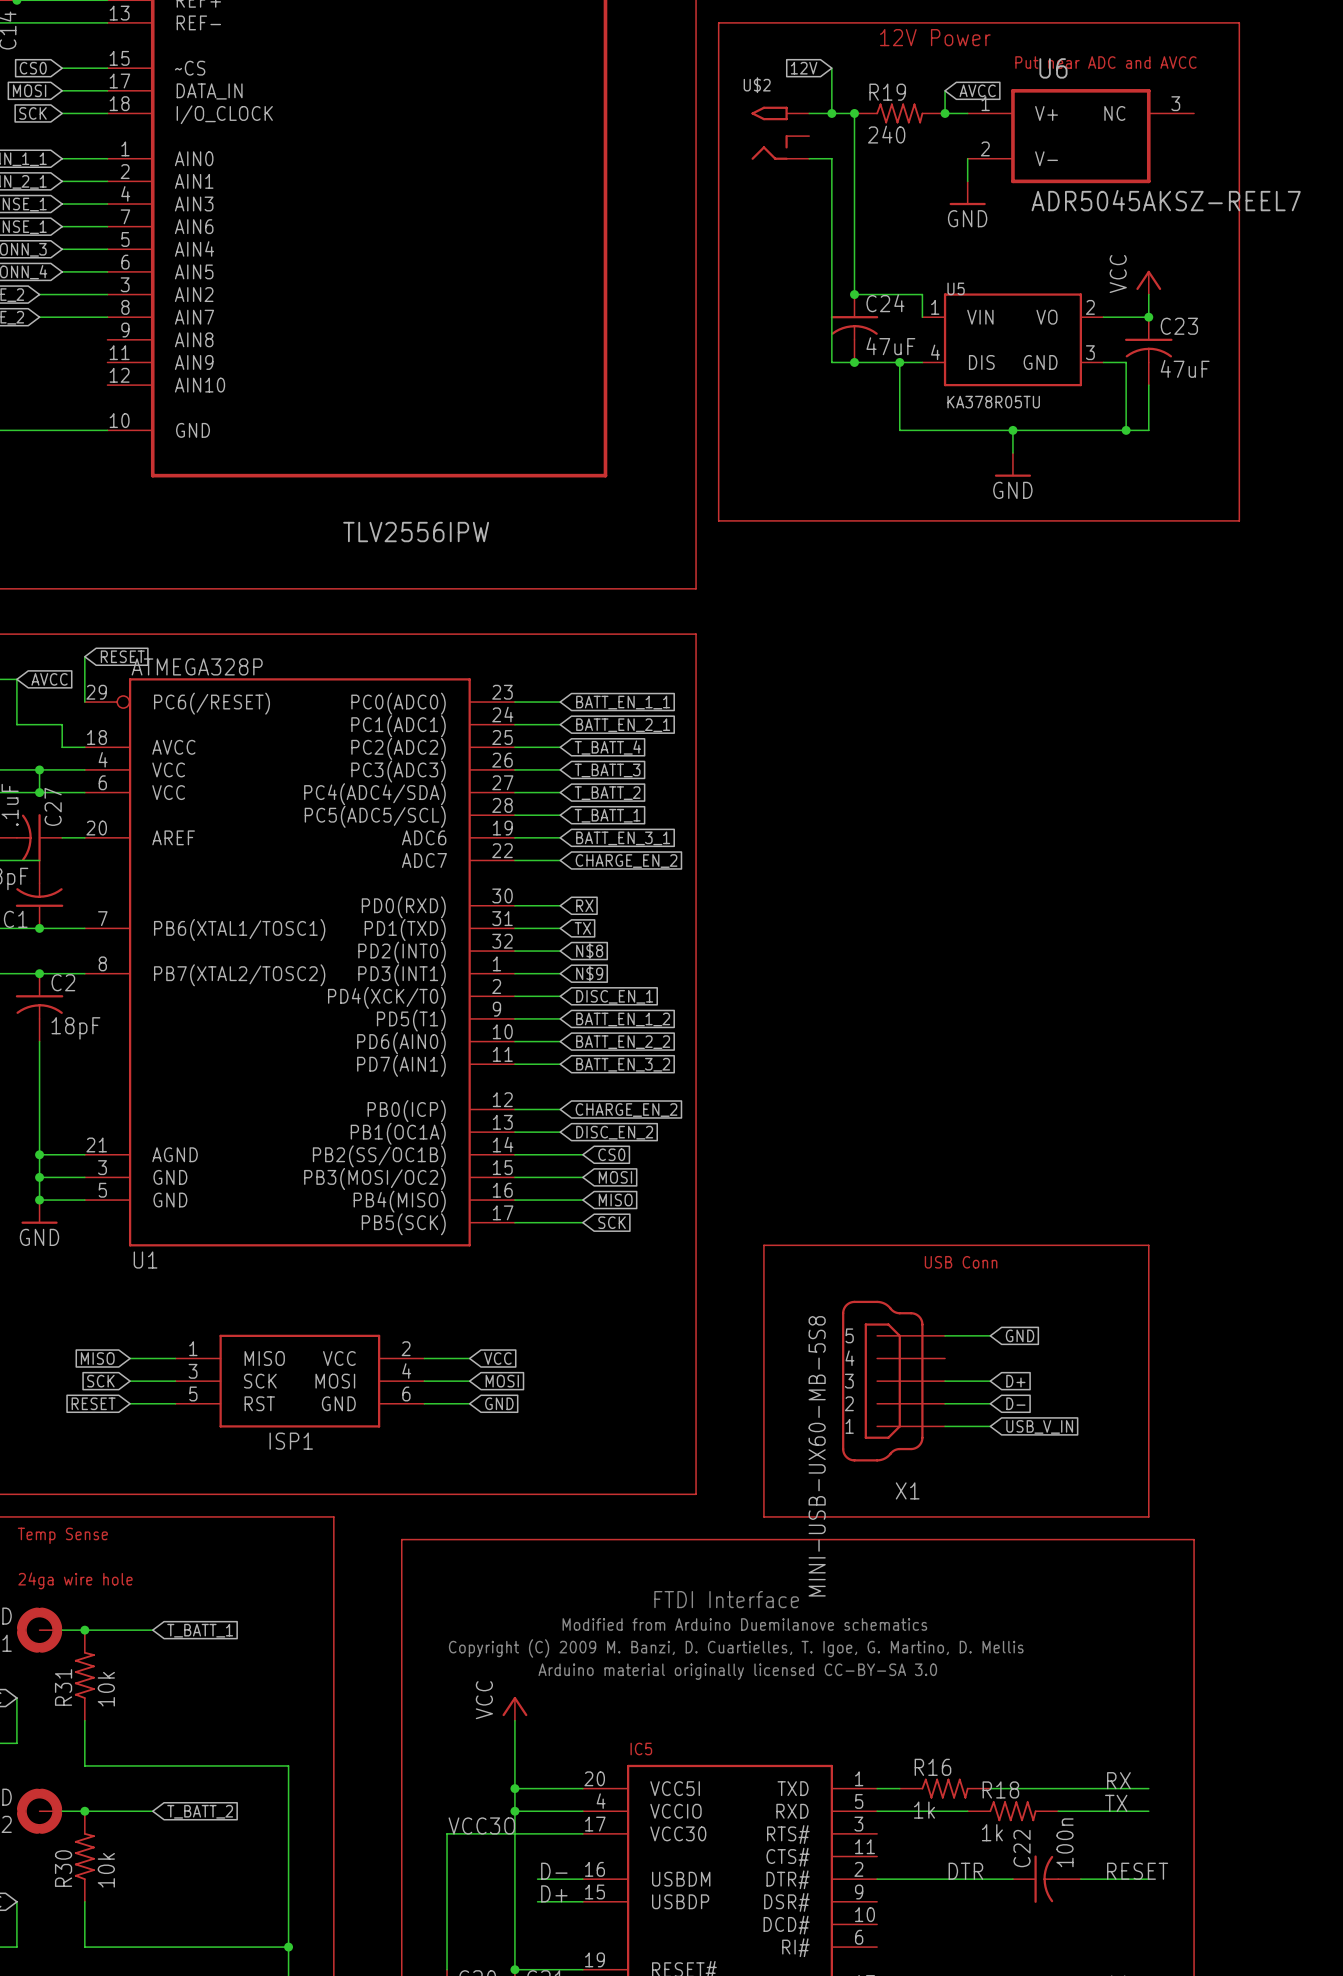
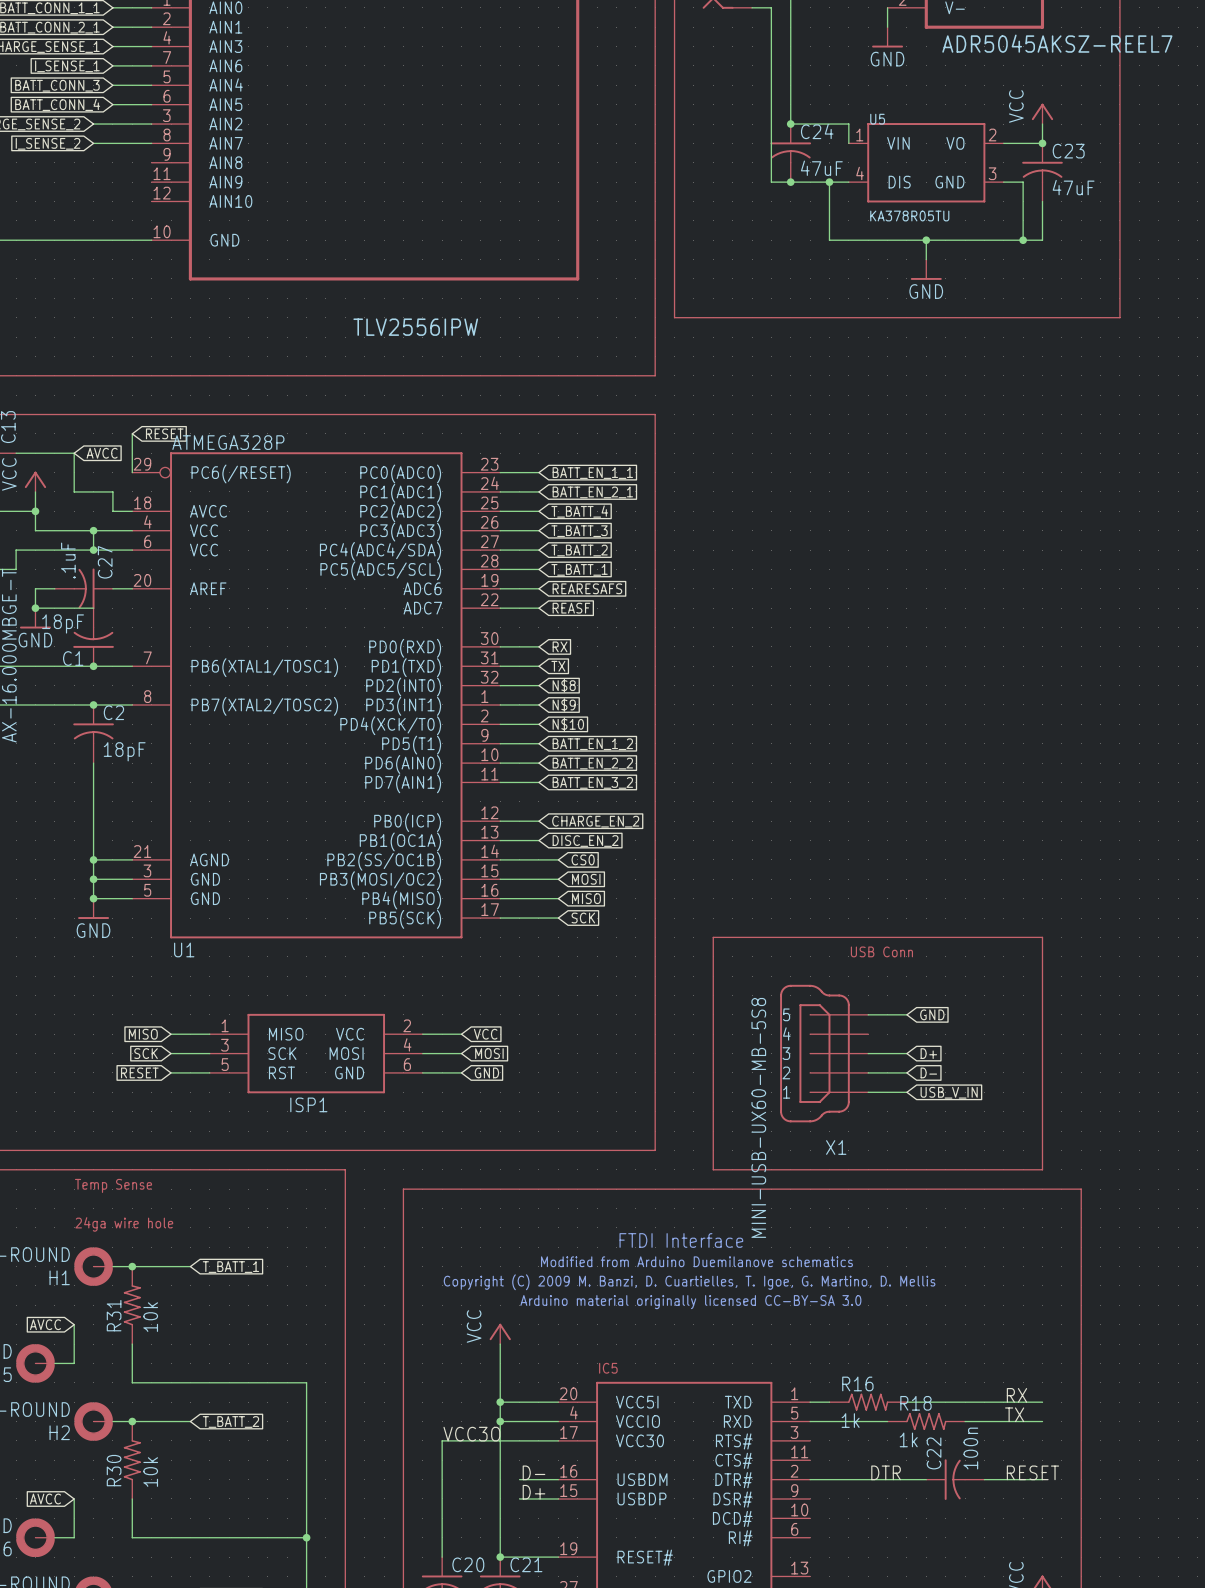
global label: BATT_EN_3_1 (623, 838) -> REARESAFS (587, 588)
global label: CHARGE_EN_2 (626, 861) -> REASF (571, 608)
global label: DISC_EN_1 (614, 996) -> N$10 (568, 724)

